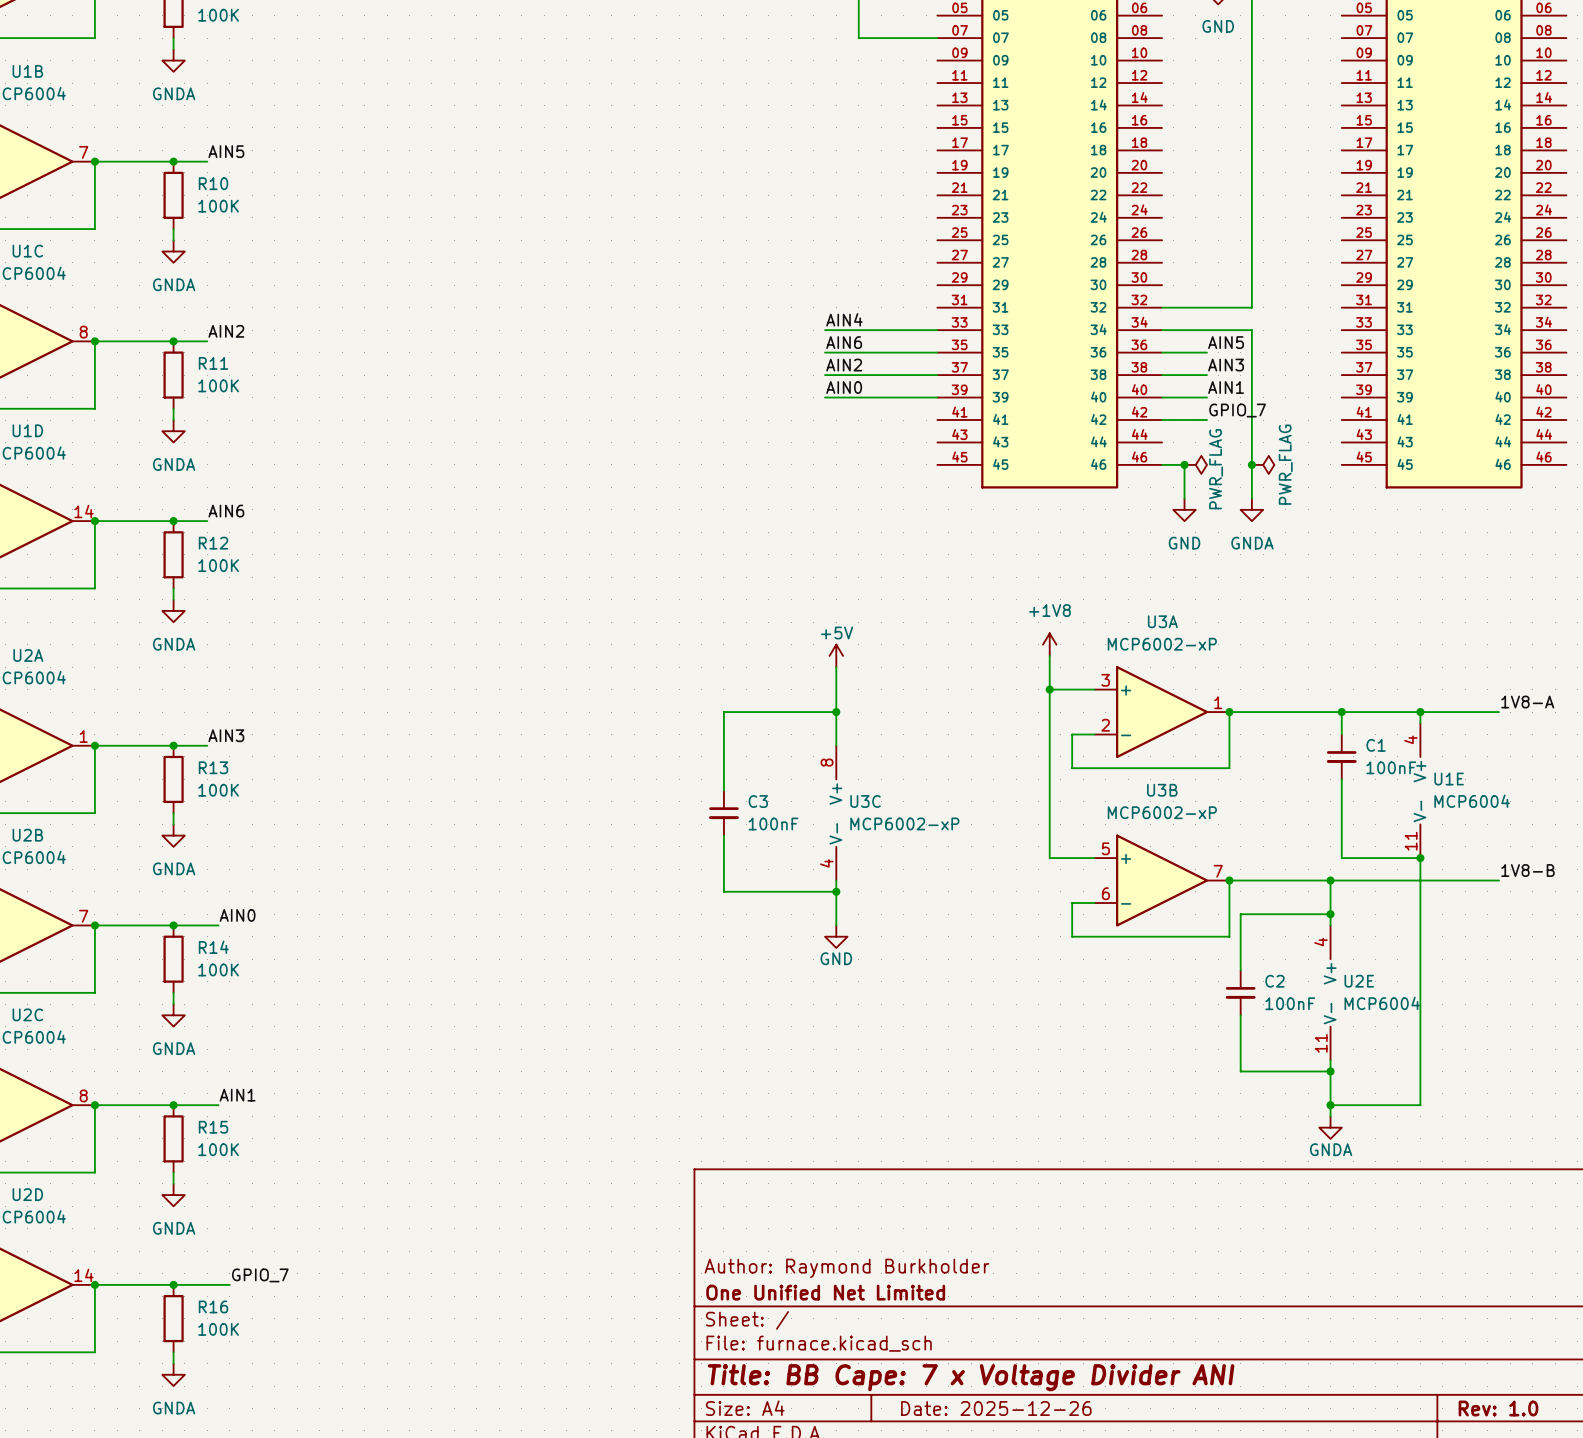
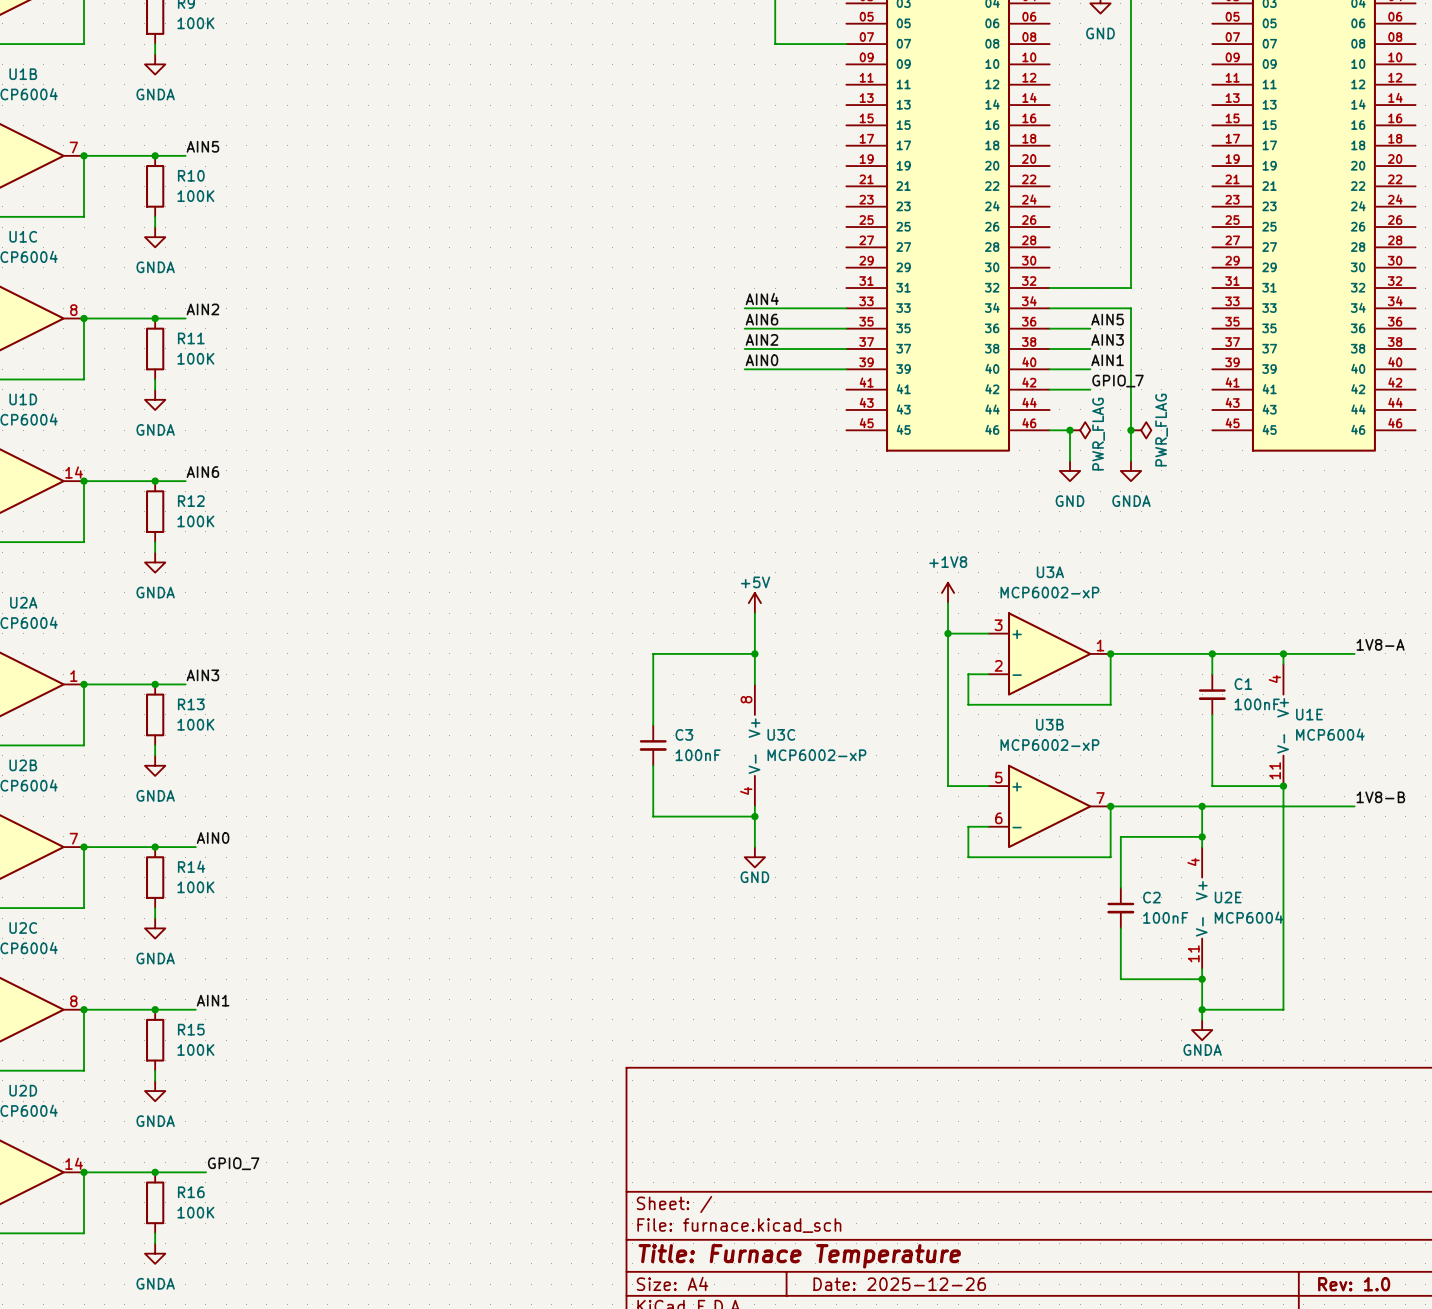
title block: Author: Raymond Burkholder (846, 1268) -> none
title block: One Unified Net Limited (825, 1292) -> none
title block: Title: BB Cape: 7 x Voltage Divider ANI (971, 1377) -> Title: Furnace Temperature (799, 1256)

